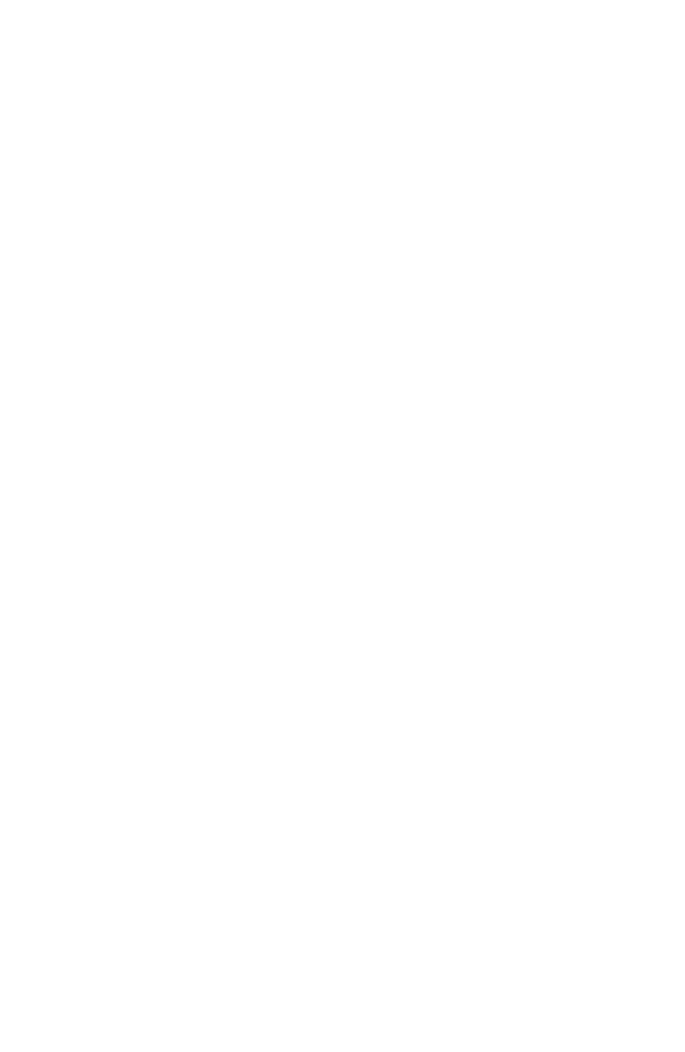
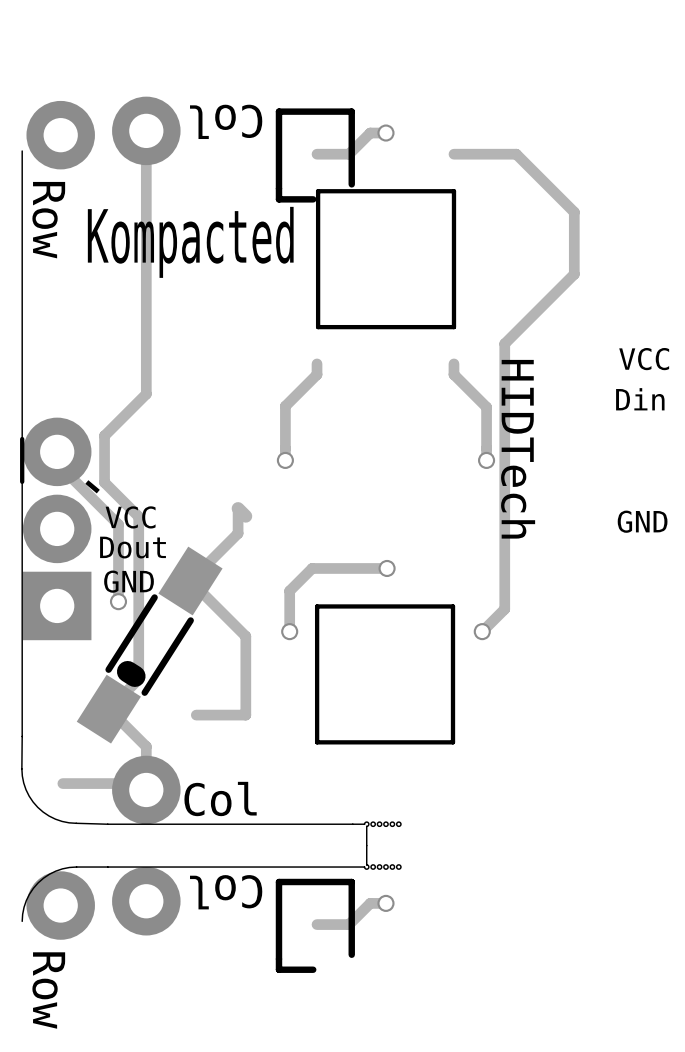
text: none -> Col (226, 121)
track: none -> (146, 130) (146, 394) (104, 435) (104, 482) (138, 516) (138, 679) (108, 709) (146, 746) (146, 789) (139, 783) (62, 783)
part: none -> (146, 130)
track: none -> (385, 133) (370, 133) (349, 154) (317, 154)
via: none -> (385, 133)
part: none -> (60, 135)
board edge: none -> (22, 151) (21, 768) (23, 783) (29, 796) (37, 807) (49, 816) (69, 822) (364, 824) (366, 822) (368, 824) (366, 826) (366, 864) (368, 867) (367, 869) (364, 867) (69, 867) (49, 874) (33, 888) (24, 907) (22, 921)
track: none -> (453, 154) (516, 154) (574, 212) (574, 274) (504, 343) (504, 609) (482, 631)
line: none -> (351, 184) (351, 111) (278, 111) (278, 199) (313, 199)
board edge: none -> (318, 191) (453, 191) (453, 327) (318, 327) (318, 191)
text: none -> Row (48, 220)
text: none -> Kompacted (190, 242)
text: none -> VCC (644, 359)
track: none -> (317, 363) (317, 374) (285, 406) (285, 460)
track: none -> (453, 363) (453, 374) (486, 407) (486, 460)
text: none -> Din (640, 399)
text: none -> HIDTech (518, 449)
part: none -> (57, 451)
via: none -> (285, 460)
via: none -> (486, 460)
track: none -> (57, 463) (118, 524) (118, 601)
text: none -> - (92, 486)
track: none -> (245, 516) (238, 508) (238, 533) (190, 581) (245, 636) (245, 715) (196, 715)
text: none -> VCC (130, 517)
text: none -> GND (642, 521)
part: none -> (57, 528)
text: none -> Dout (133, 547)
track: none -> (387, 568) (312, 568) (289, 590) (289, 631)
via: none -> (387, 568)
text: none -> GND (129, 581)
via: none -> (118, 601)
part: none -> (57, 605)
board edge: none -> (317, 606) (317, 742) (453, 742) (453, 606) (317, 606)
via: none -> (289, 631)
via: none -> (482, 631)
part: none -> (149, 645)
part: none -> (146, 789)
text: none -> Col (220, 799)
round board edge: none -> [370, 821, 376, 827]
round board edge: none -> [377, 821, 382, 827]
round board edge: none -> [383, 821, 389, 827]
round board edge: none -> [390, 821, 395, 827]
round board edge: none -> [396, 821, 402, 827]
round board edge: none -> [370, 864, 376, 870]
round board edge: none -> [377, 864, 382, 870]
round board edge: none -> [383, 864, 389, 870]
round board edge: none -> [390, 864, 395, 870]
round board edge: none -> [396, 864, 402, 870]
text: none -> Col (226, 892)
part: none -> (146, 901)
track: none -> (385, 903) (370, 903) (349, 924) (317, 924)
via: none -> (385, 903)
part: none -> (60, 905)
line: none -> (351, 954) (351, 882) (278, 882) (278, 969) (313, 969)
text: none -> Row (48, 990)

